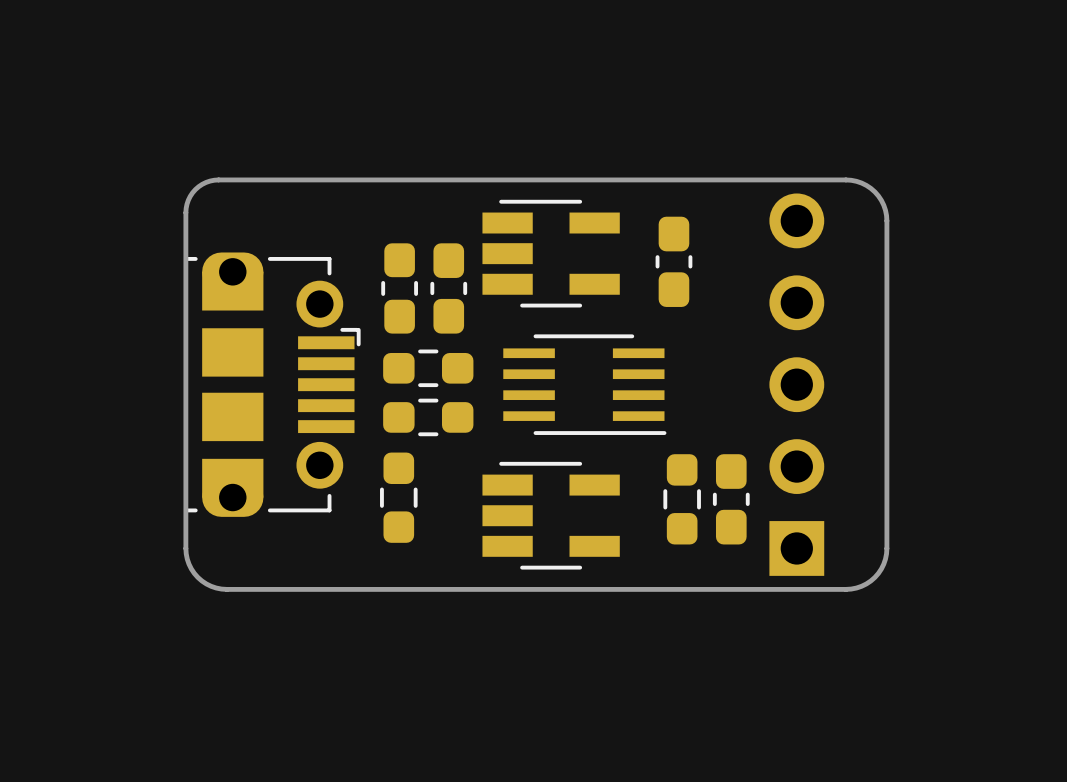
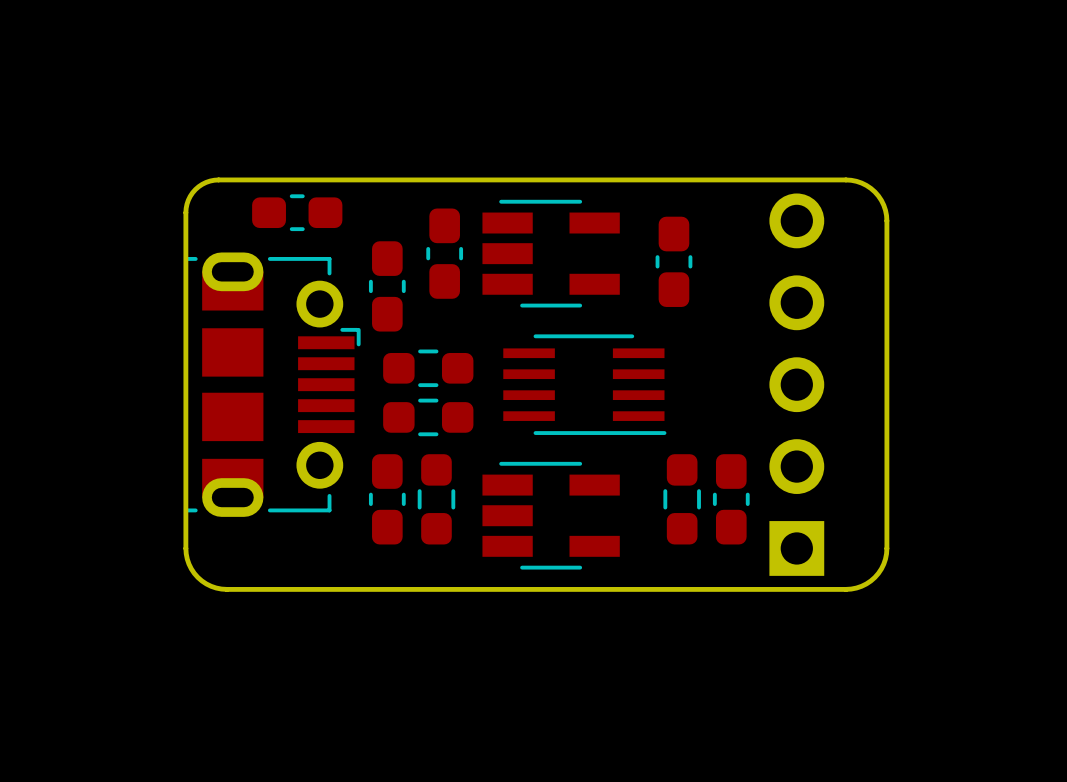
part: none -> (297, 212)
part footprint: [381, 243, 419, 334] -> [368, 241, 406, 332]
part footprint: [185, 252, 361, 517] -> [185, 252, 361, 517]
part position: (448, 288) -> (444, 253)
part footprint: [380, 452, 418, 543] -> [368, 454, 406, 545]
part: none -> (436, 499)

